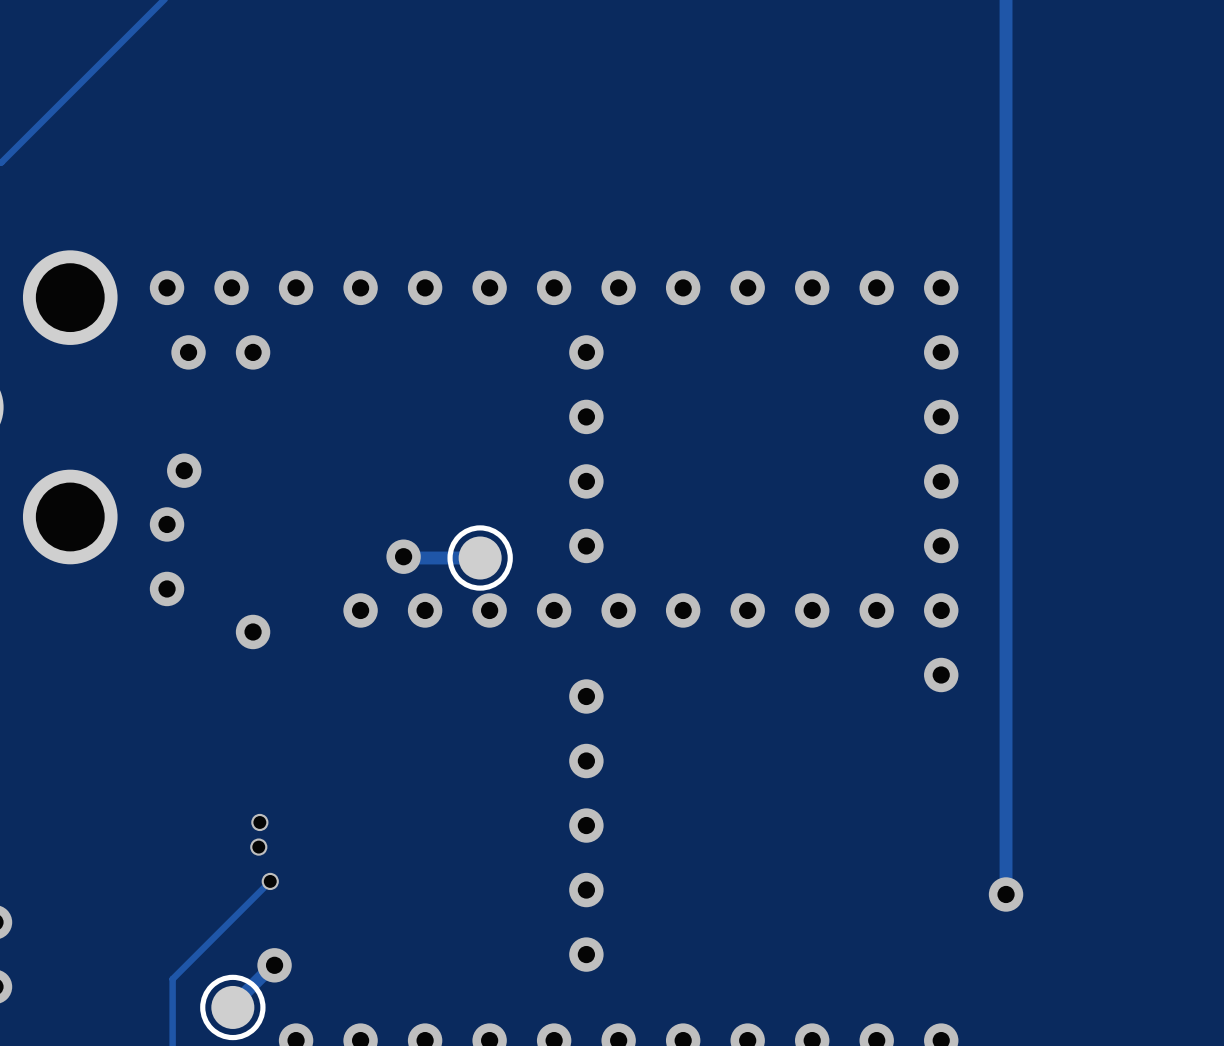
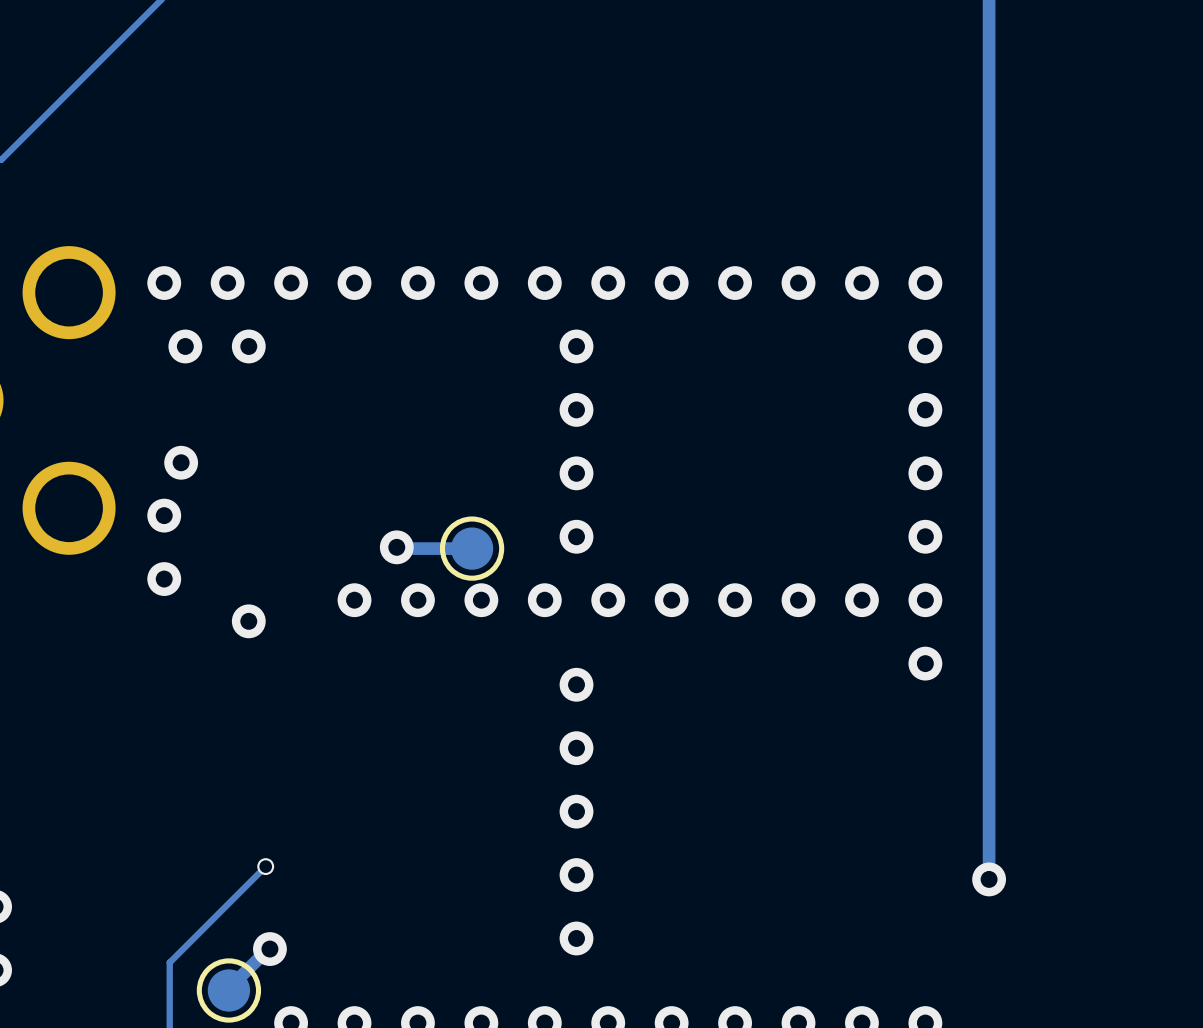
via: (259, 822) -> none
via: (258, 847) -> none

